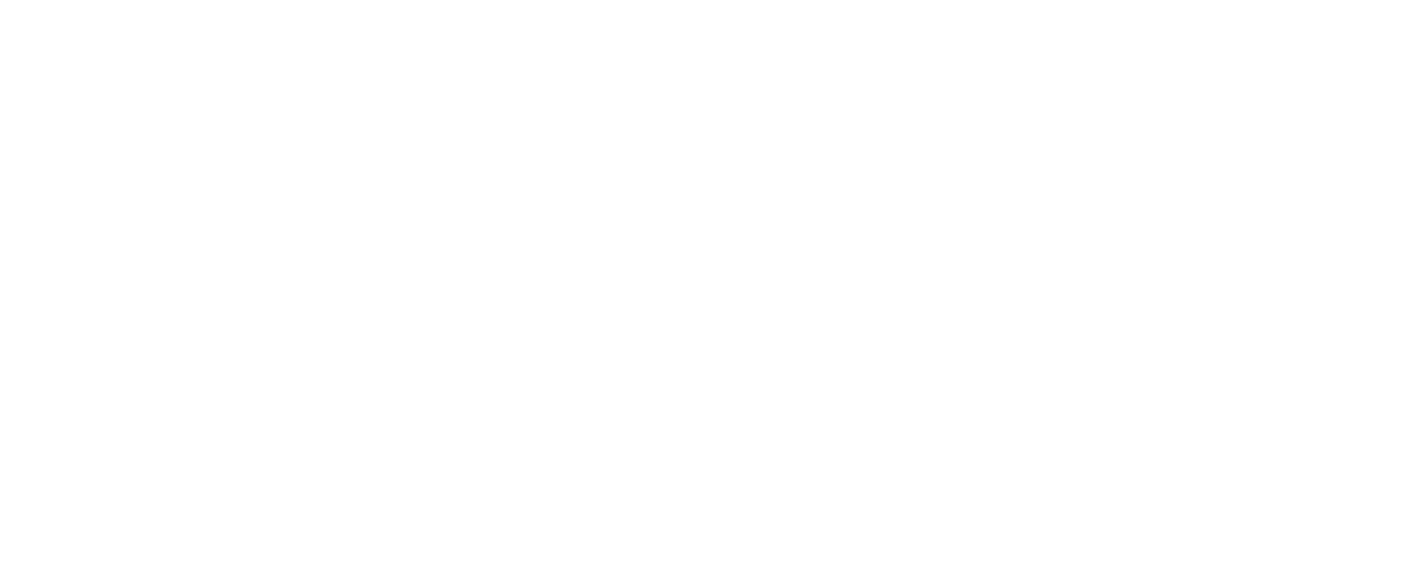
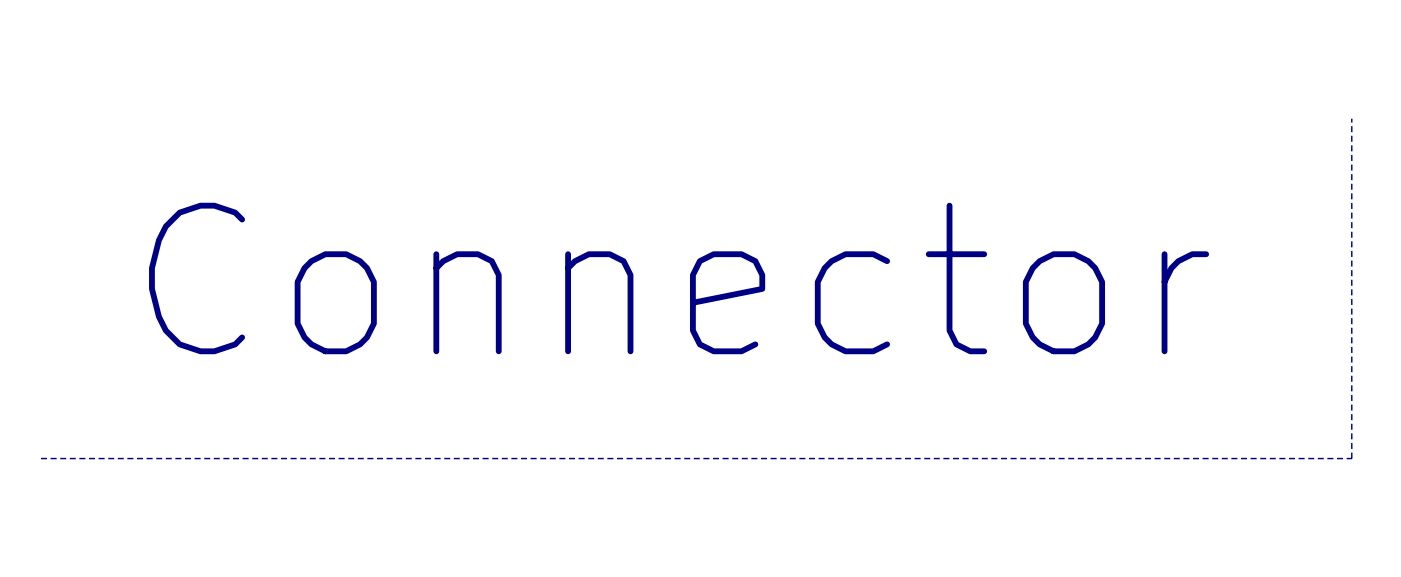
line: none -> (1351, 118) (1351, 458) (40, 458)
text: none -> Connector (679, 278)

